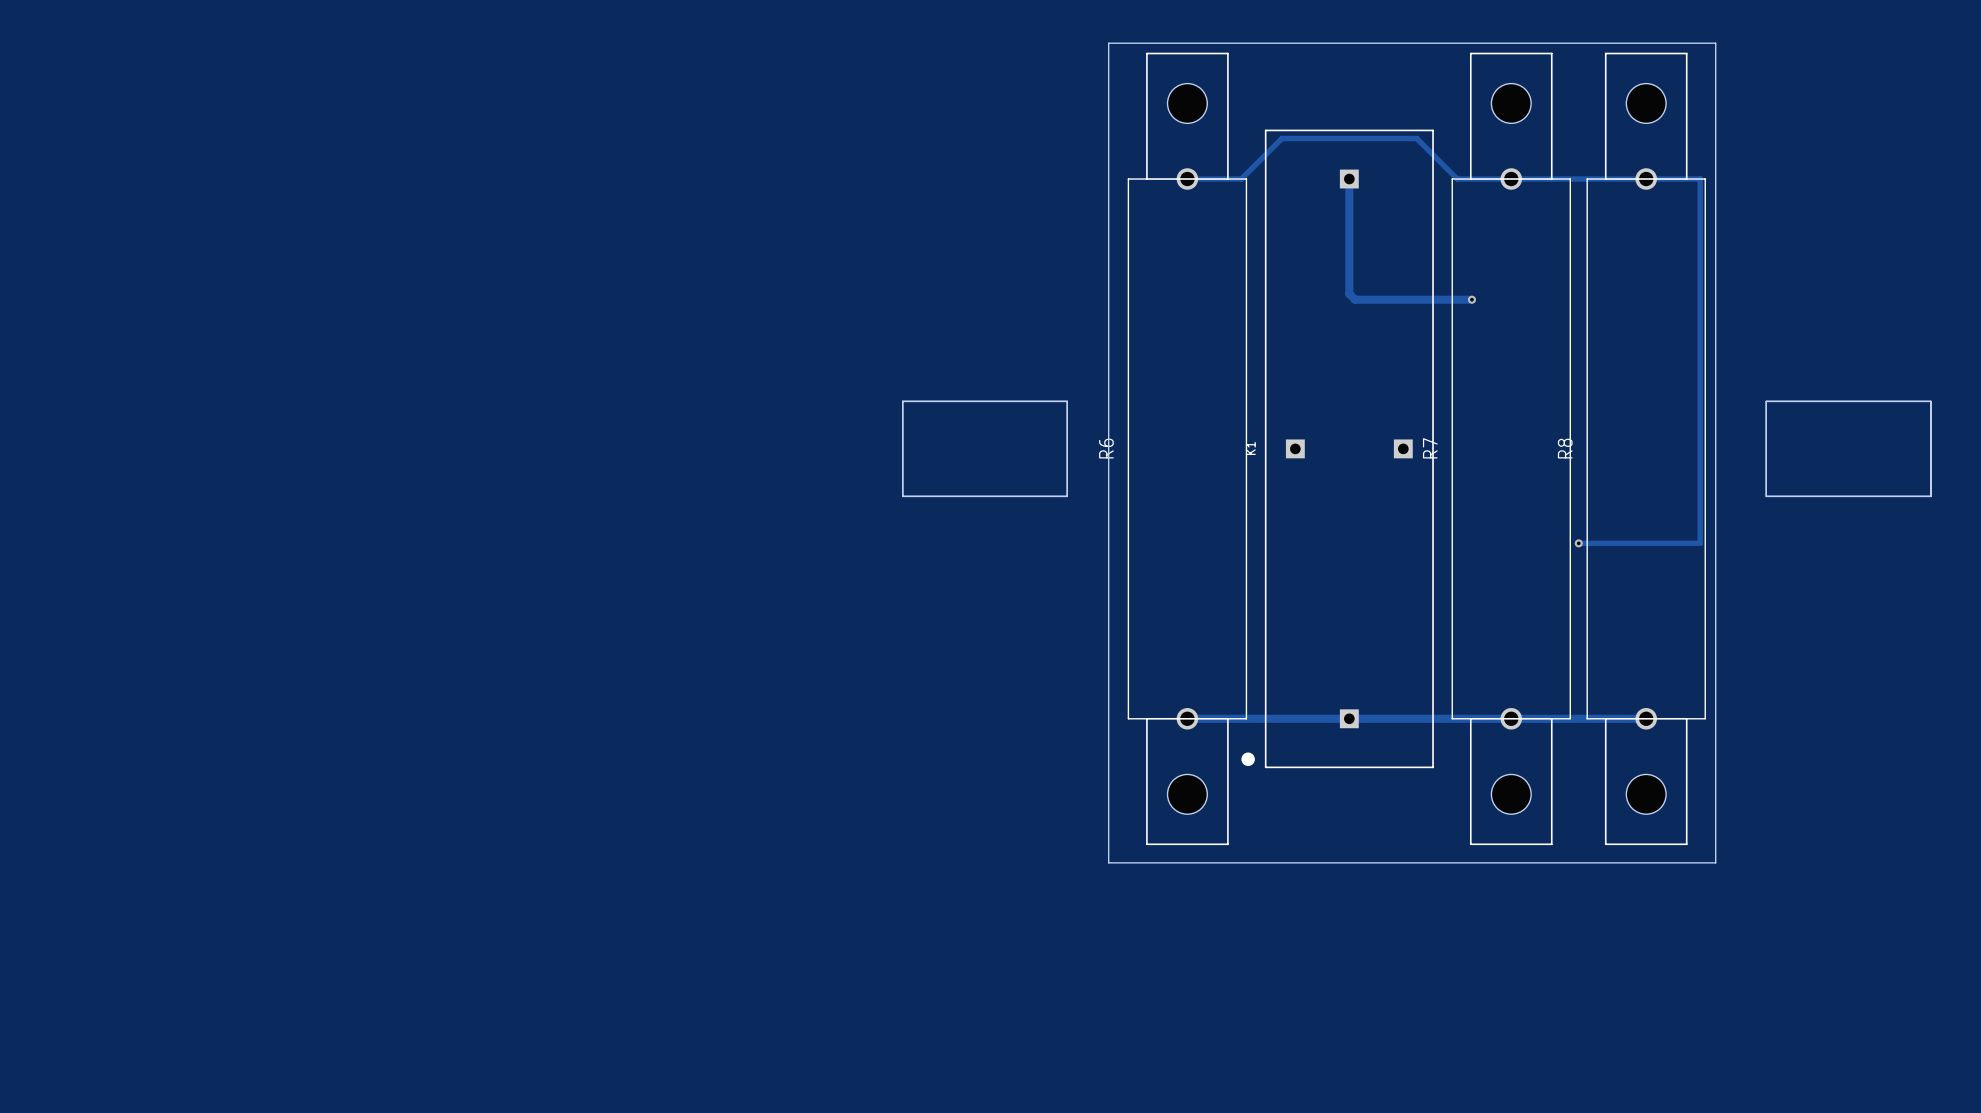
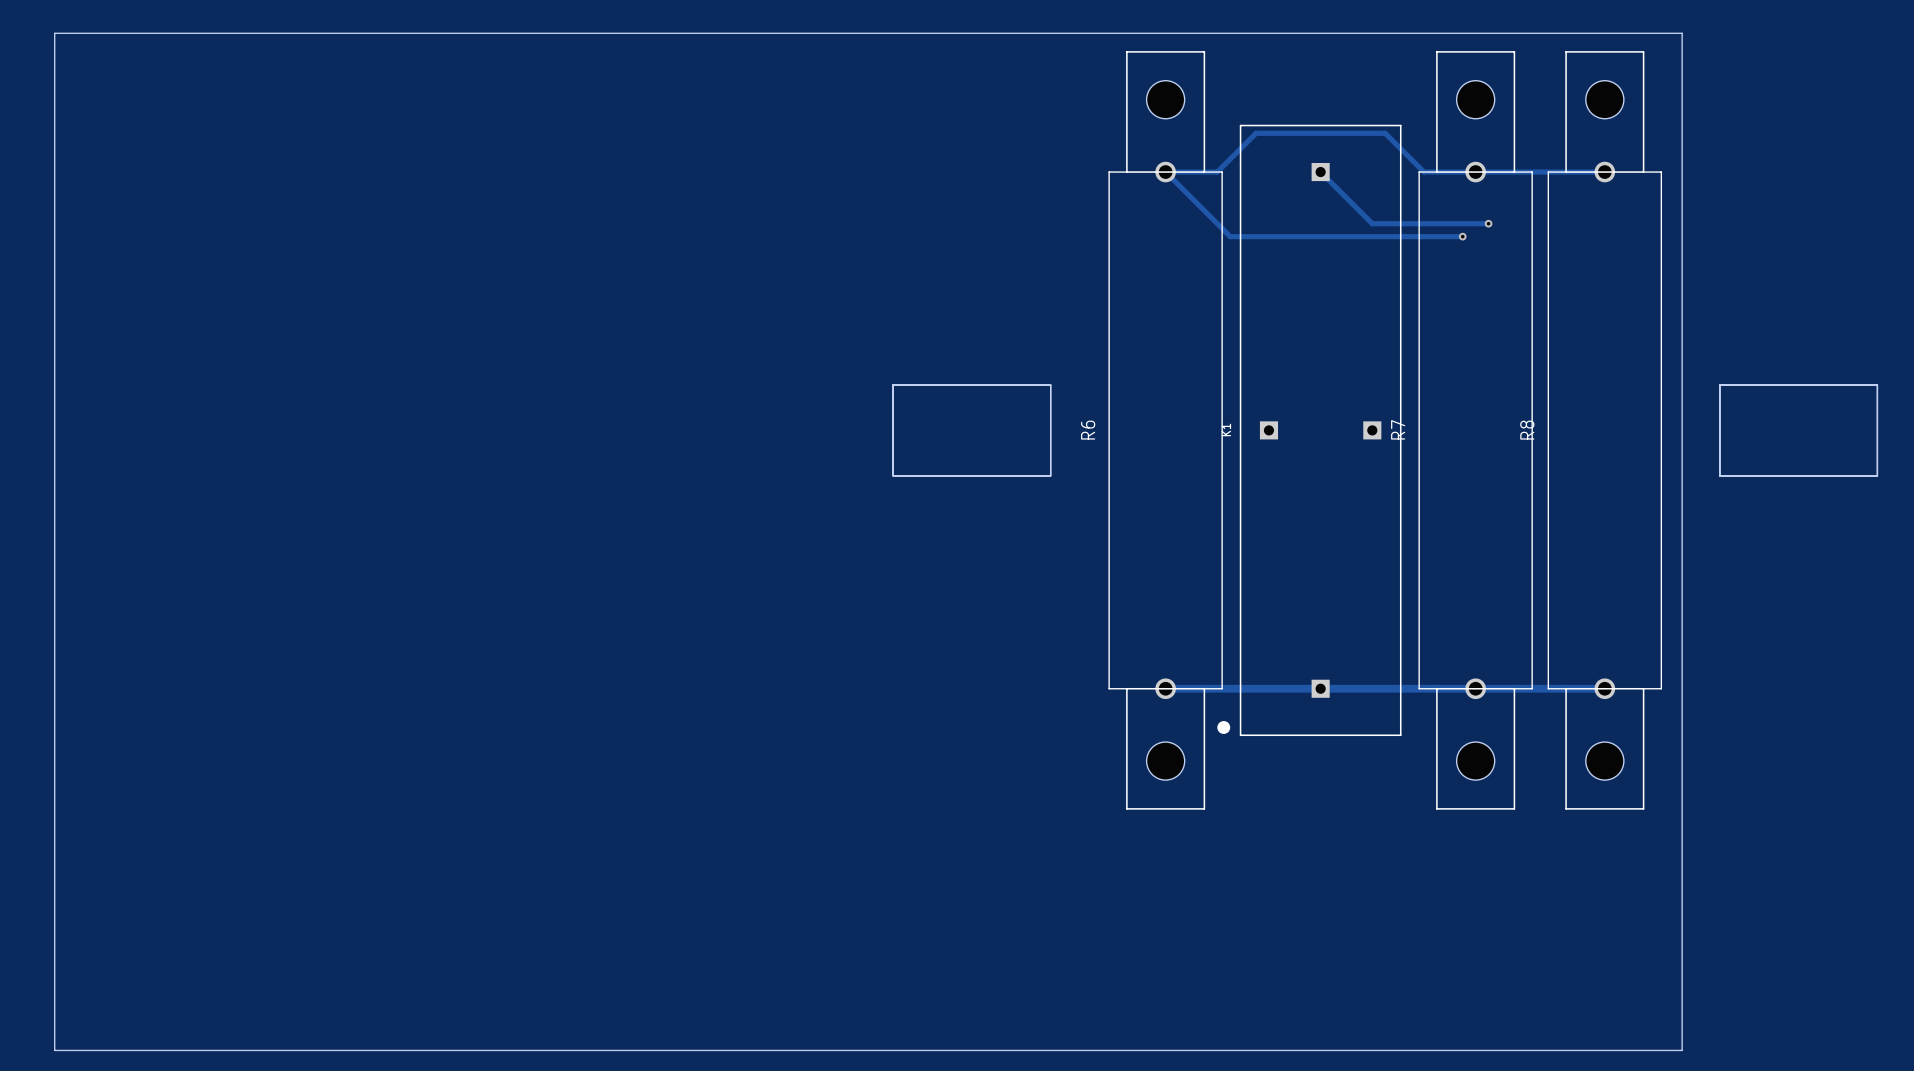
board edge: none -> (54, 33) (1682, 33) (1682, 1050) (54, 1050) (54, 33)
board edge: (1108, 43) (1715, 43) (1715, 862) (1108, 862) (1108, 43) -> none
track: none -> (1165, 172) (1230, 236) (1462, 236)
track: (1349, 179) (1349, 293) (1355, 299) (1471, 299) -> (1320, 172) (1372, 223) (1488, 223)
track: (1646, 179) (1700, 179) (1700, 543) (1578, 543) -> none
via: none -> (1488, 223)
via: none -> (1462, 236)
via: (1471, 299) -> none
via: (1578, 543) -> none

